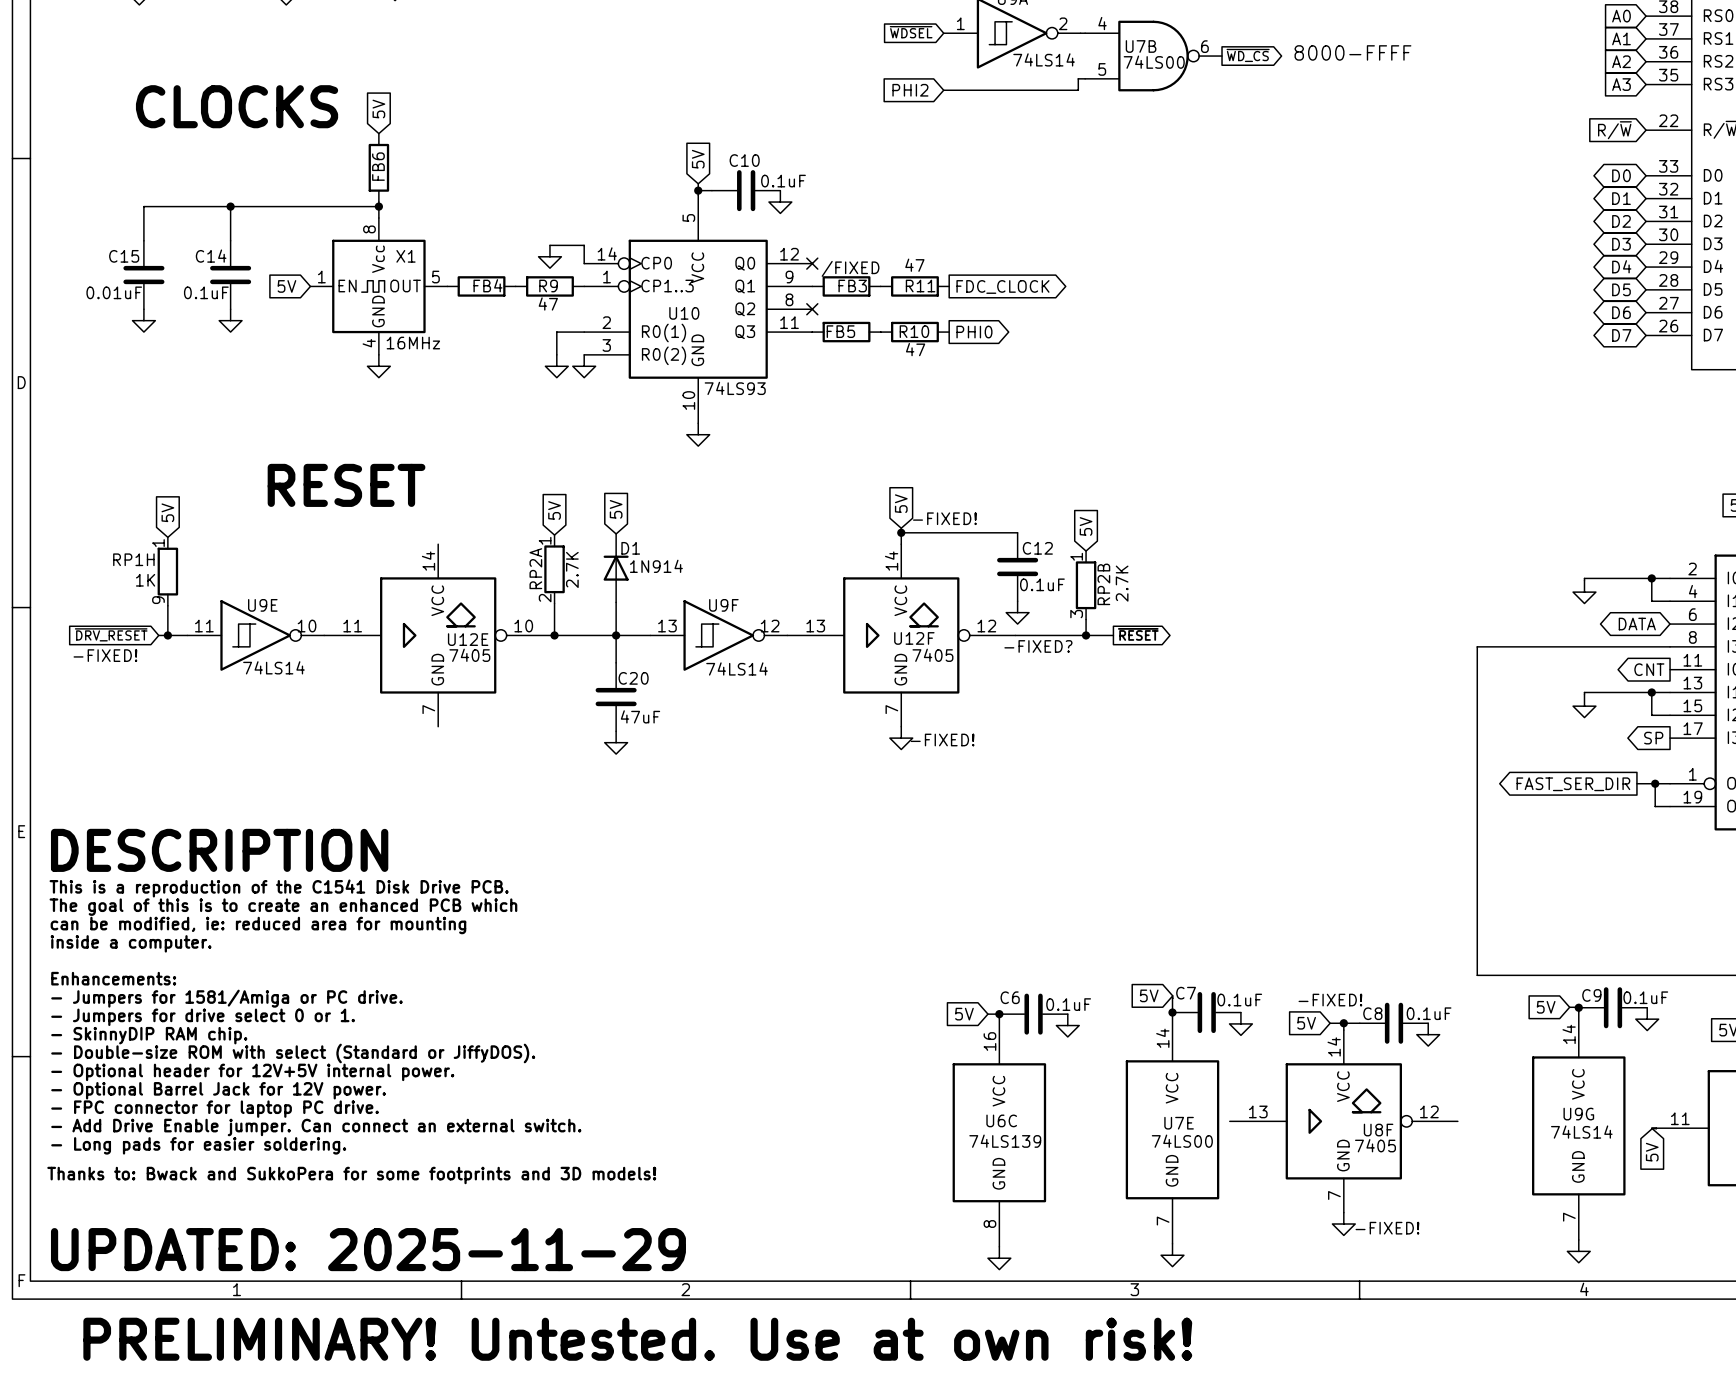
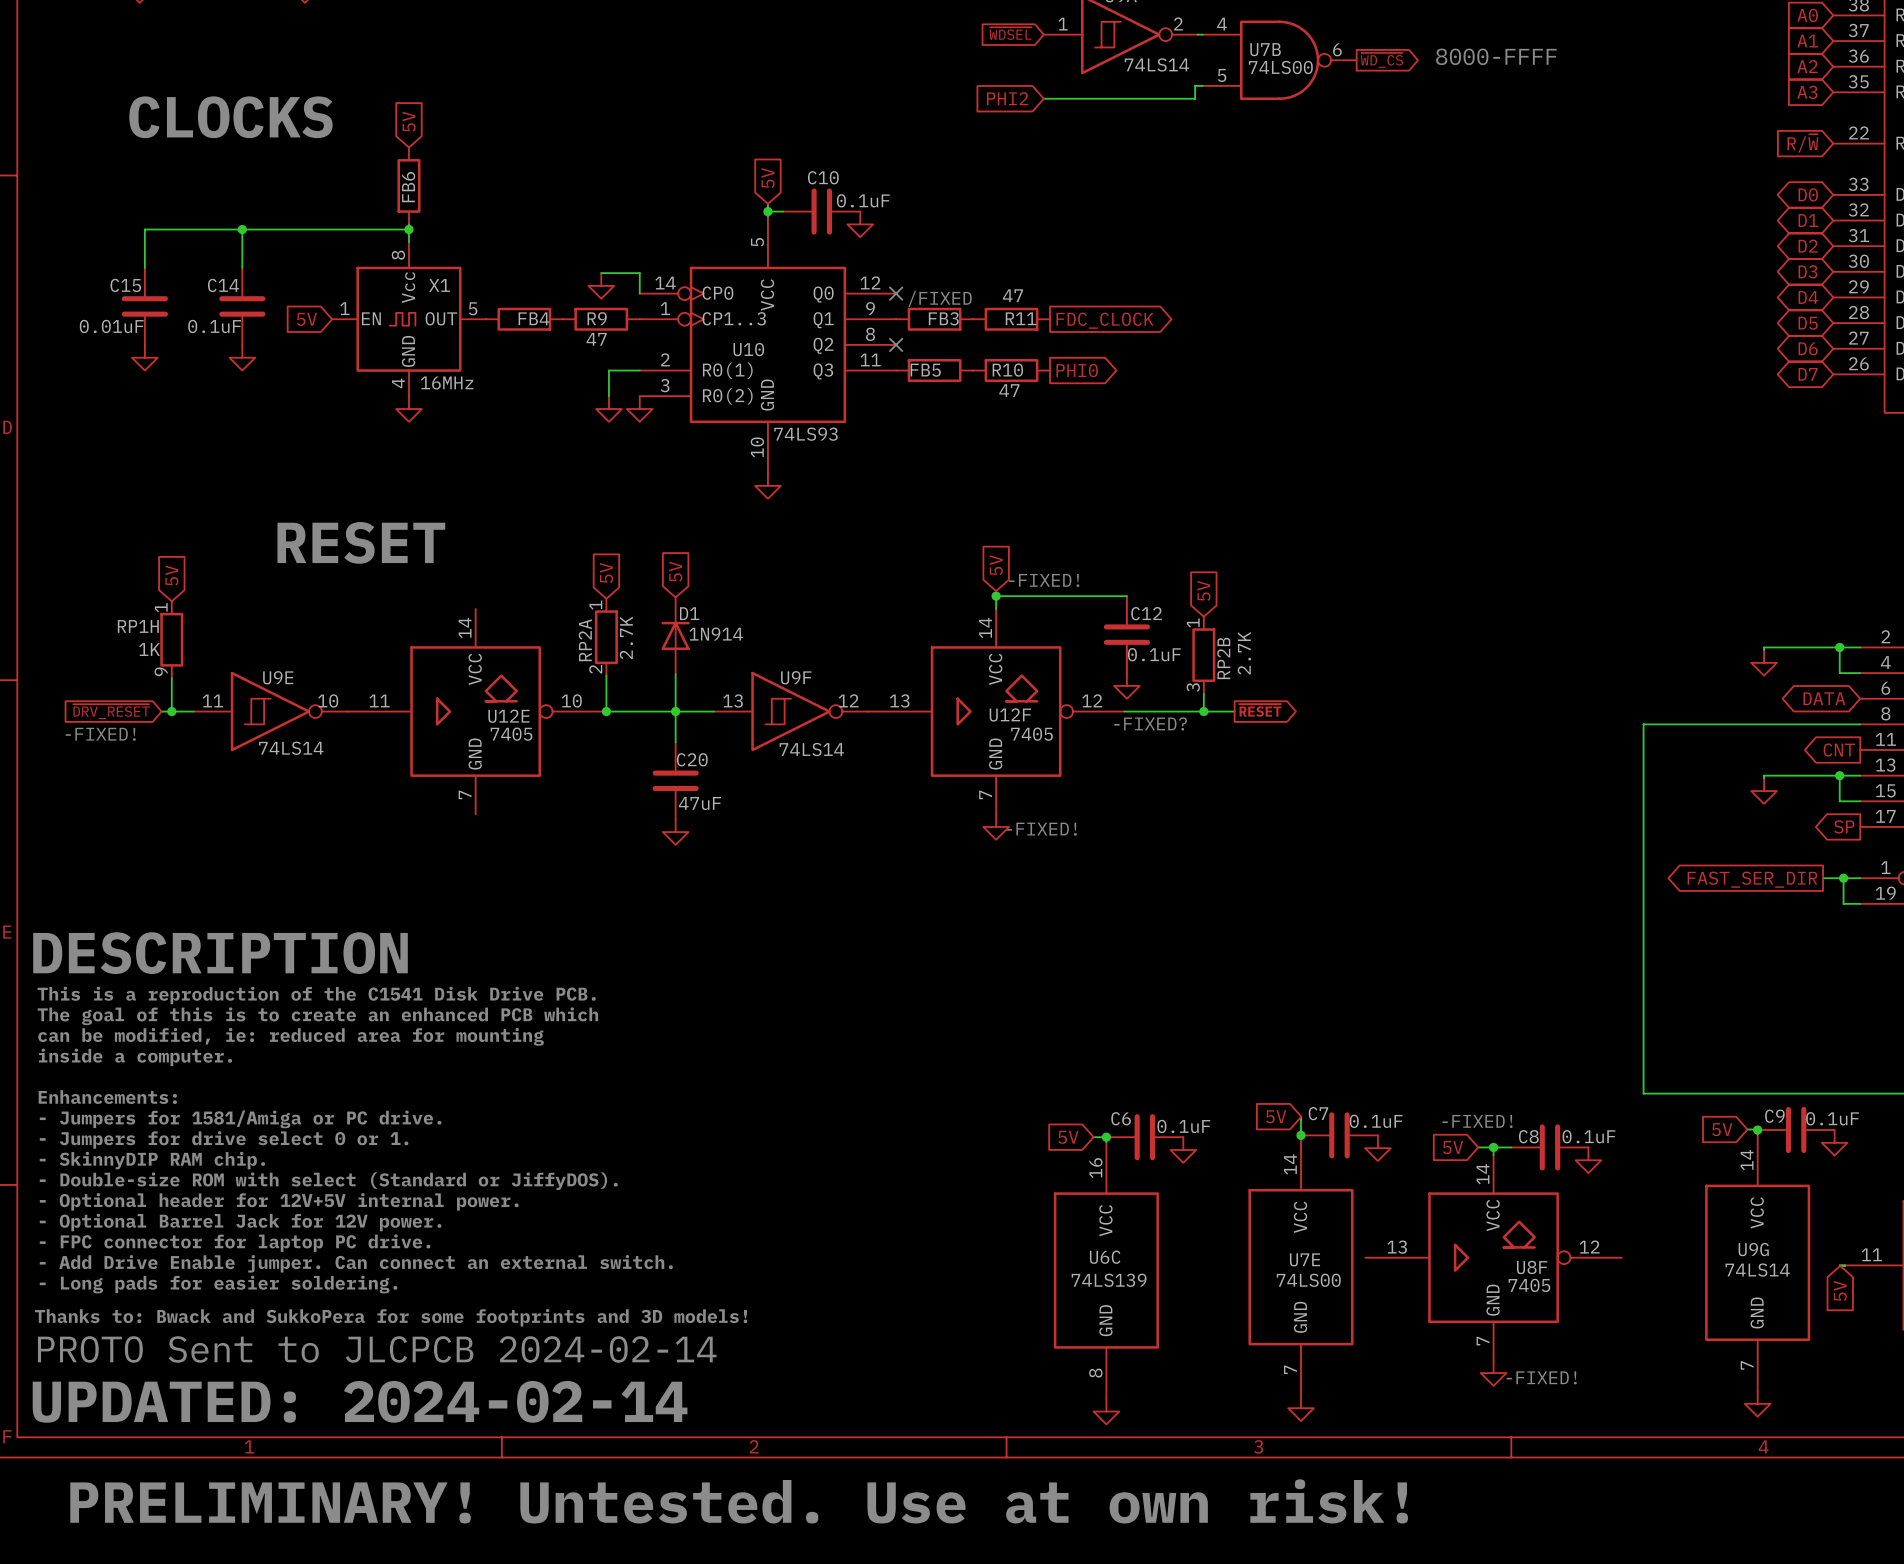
text: none -> PROTO Sent to JLCPCB 2024-02-14 (377, 1349)
text: UPDATED: 2025-11-29 (368, 1249) -> UPDATED: 2024-02-14 (360, 1401)

